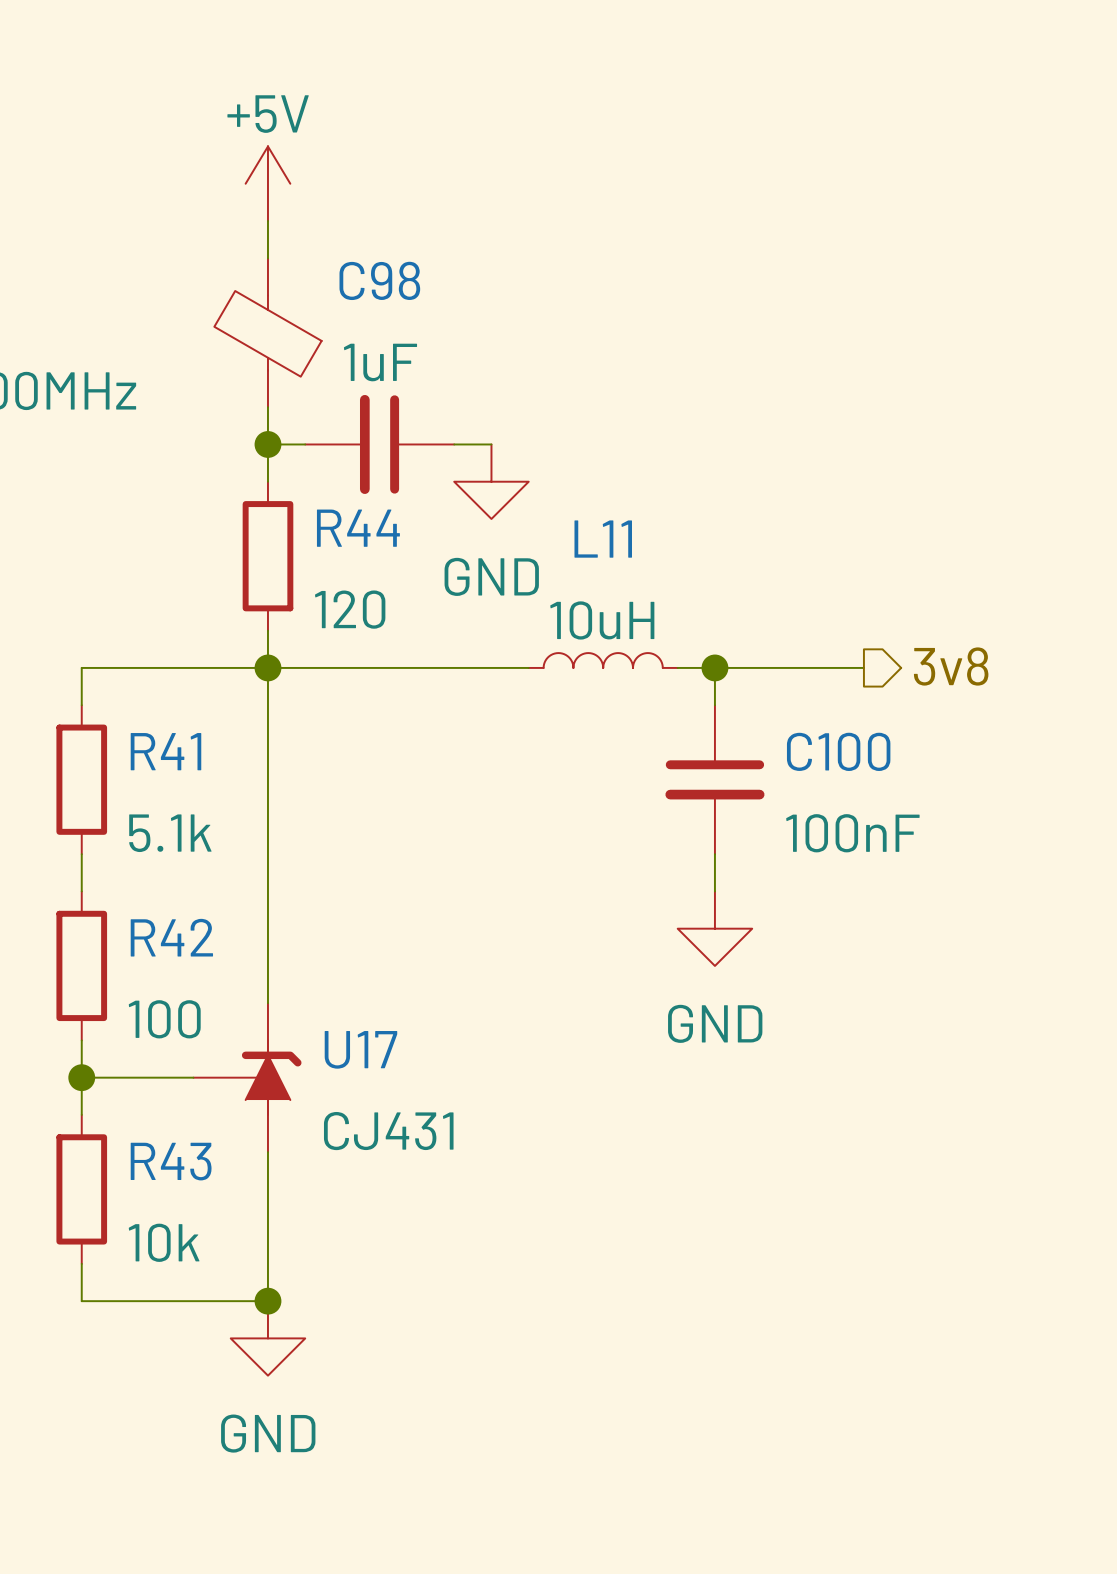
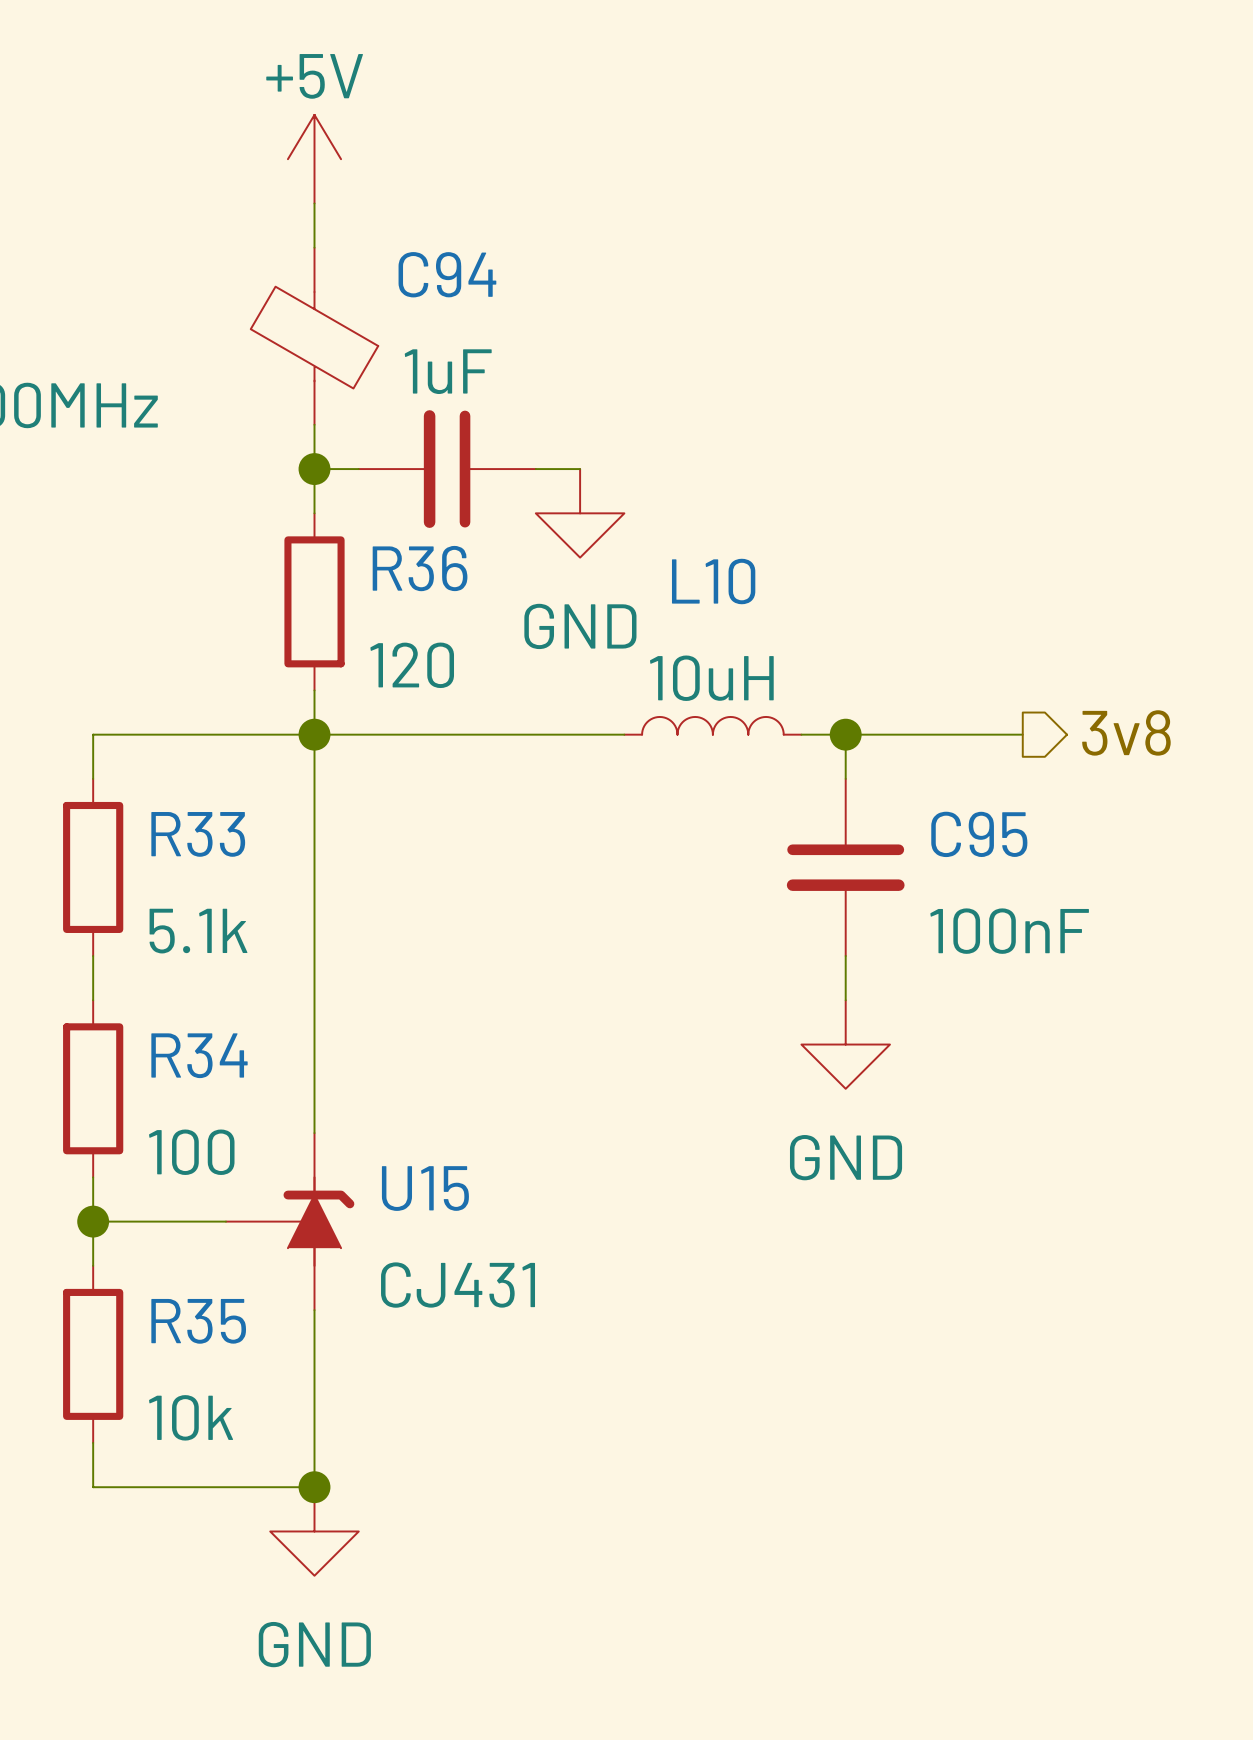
C98 name: C98 (379, 280) -> C94 (447, 274)
R44 name: R44 (358, 528) -> R36 (420, 568)
L11 name: L11 (603, 539) -> L10 (713, 581)
R41 name: R41 (165, 751) -> R33 (198, 834)
C100 name: C100 (838, 751) -> C95 (979, 834)
R42 name: R42 (171, 937) -> R34 (199, 1055)
U17 name: U17 (360, 1049) -> U15 (425, 1188)
R43 name: R43 (171, 1161) -> R35 (198, 1321)

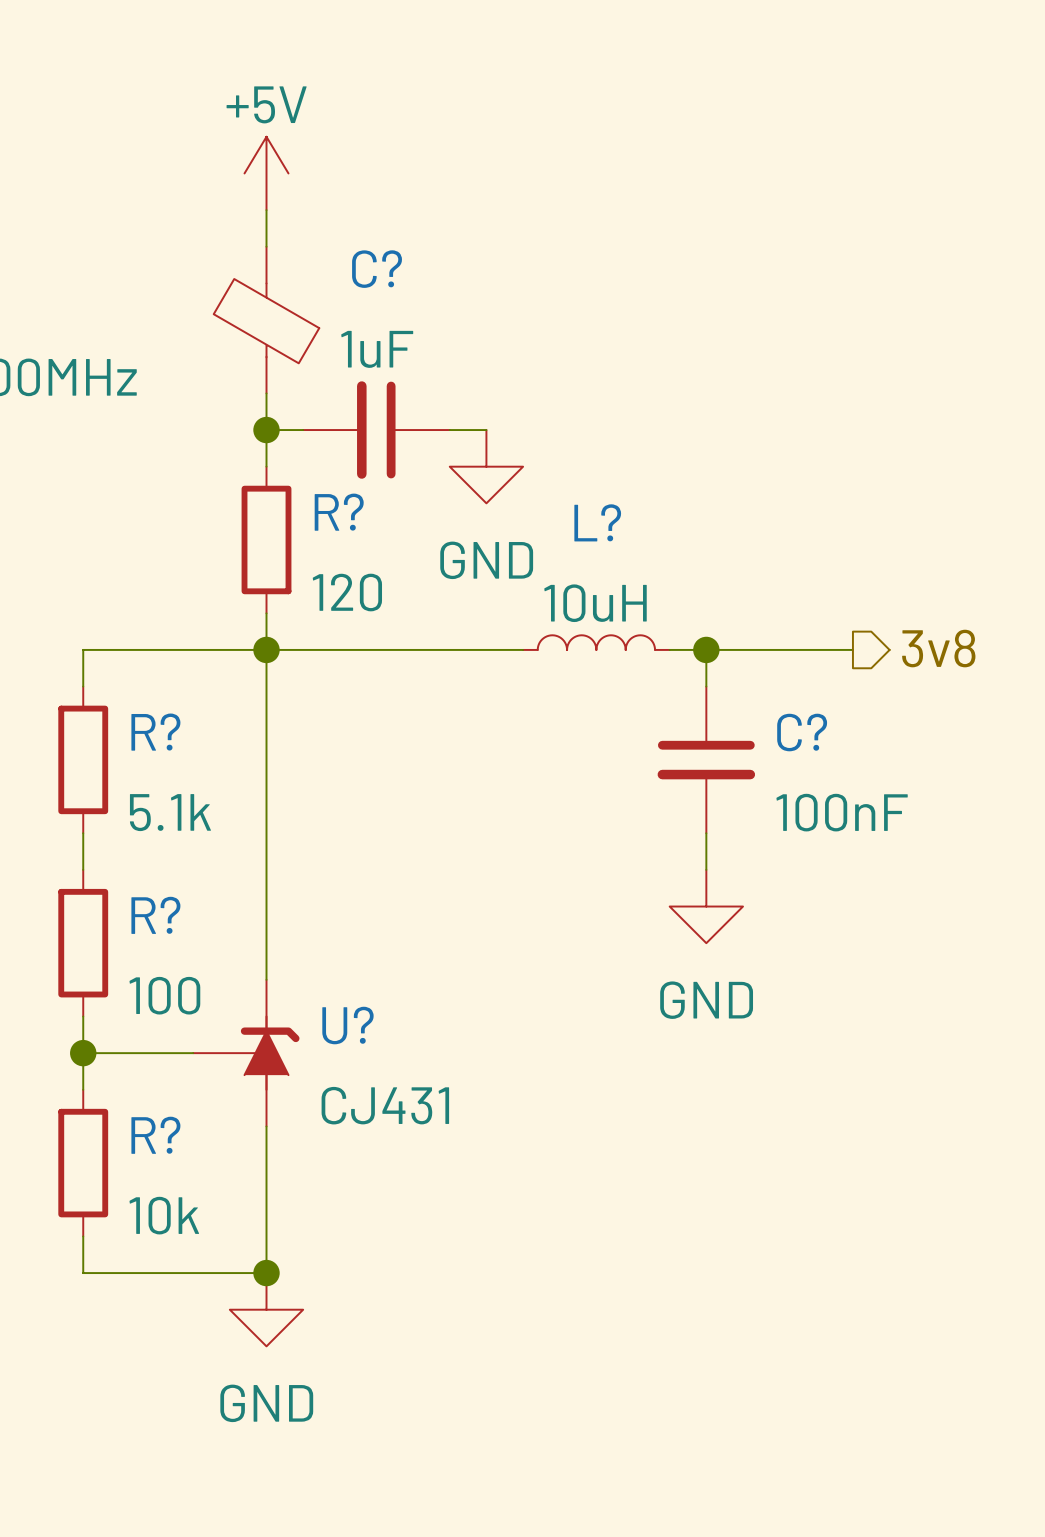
C94 name: C94 (447, 274) -> C? (377, 269)
R36 name: R36 (420, 568) -> R? (339, 512)
L10 name: L10 (713, 581) -> L? (597, 522)
R33 name: R33 (198, 834) -> R? (155, 732)
C95 name: C95 (979, 834) -> C? (802, 732)
R34 name: R34 (199, 1055) -> R? (155, 915)
U15 name: U15 (425, 1188) -> U? (347, 1025)
R35 name: R35 (198, 1321) -> R? (155, 1135)

